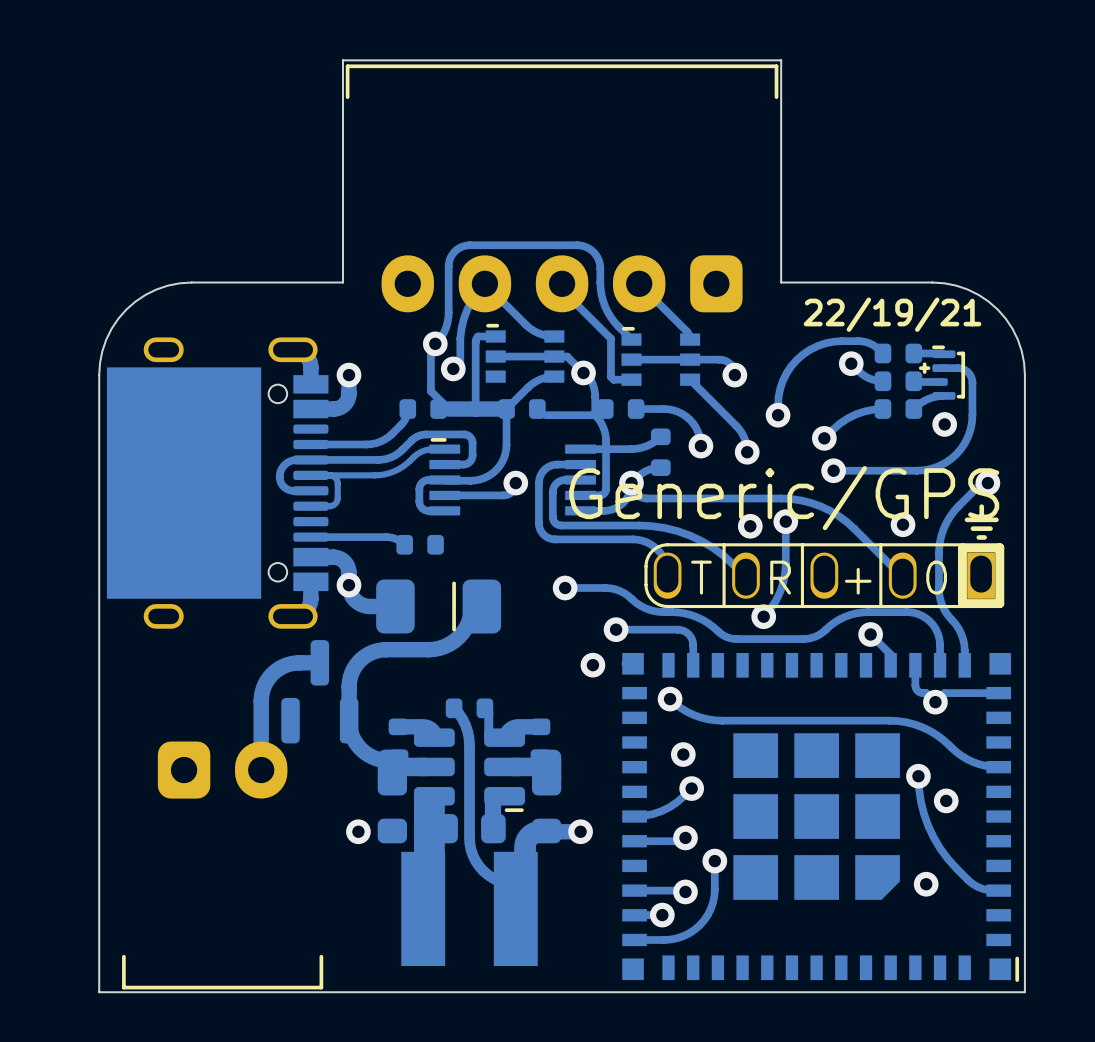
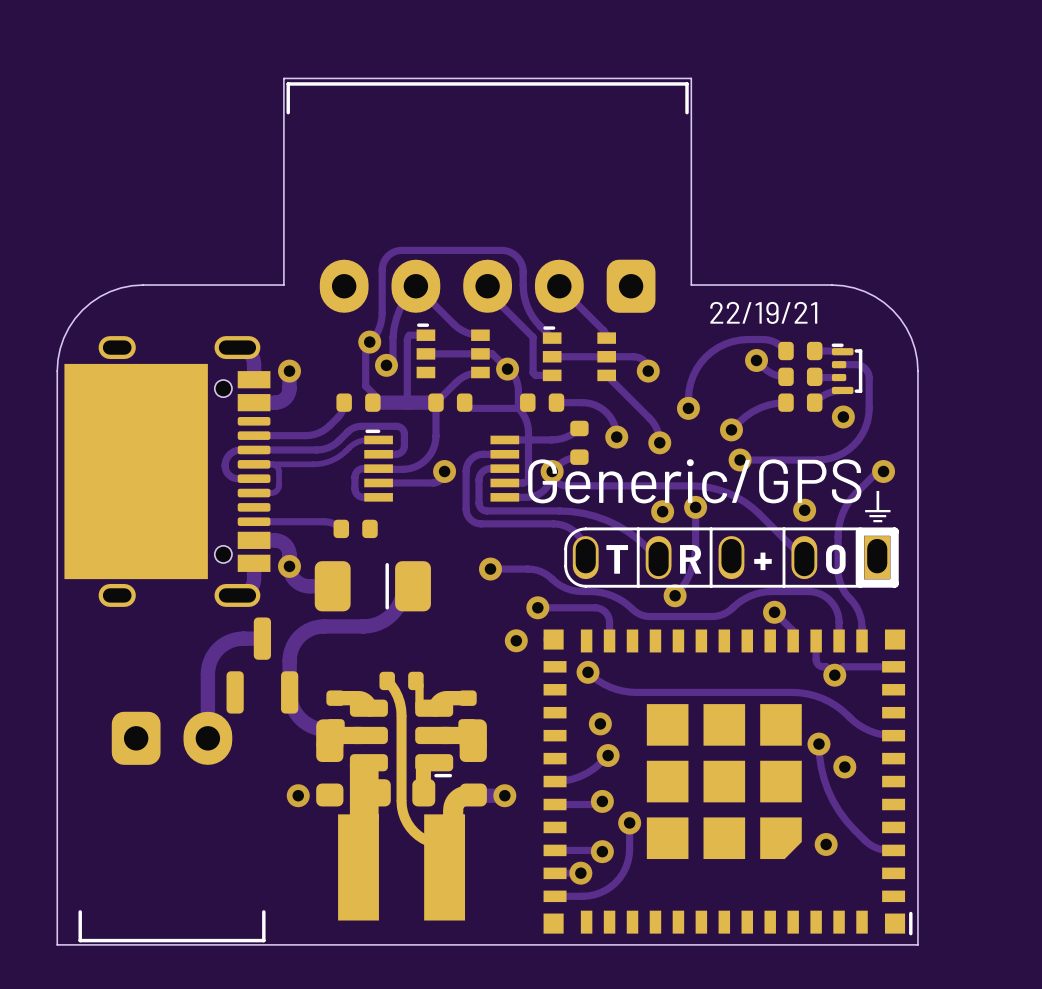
part footprint: [918, 345, 966, 400] -> [831, 343, 863, 395]

